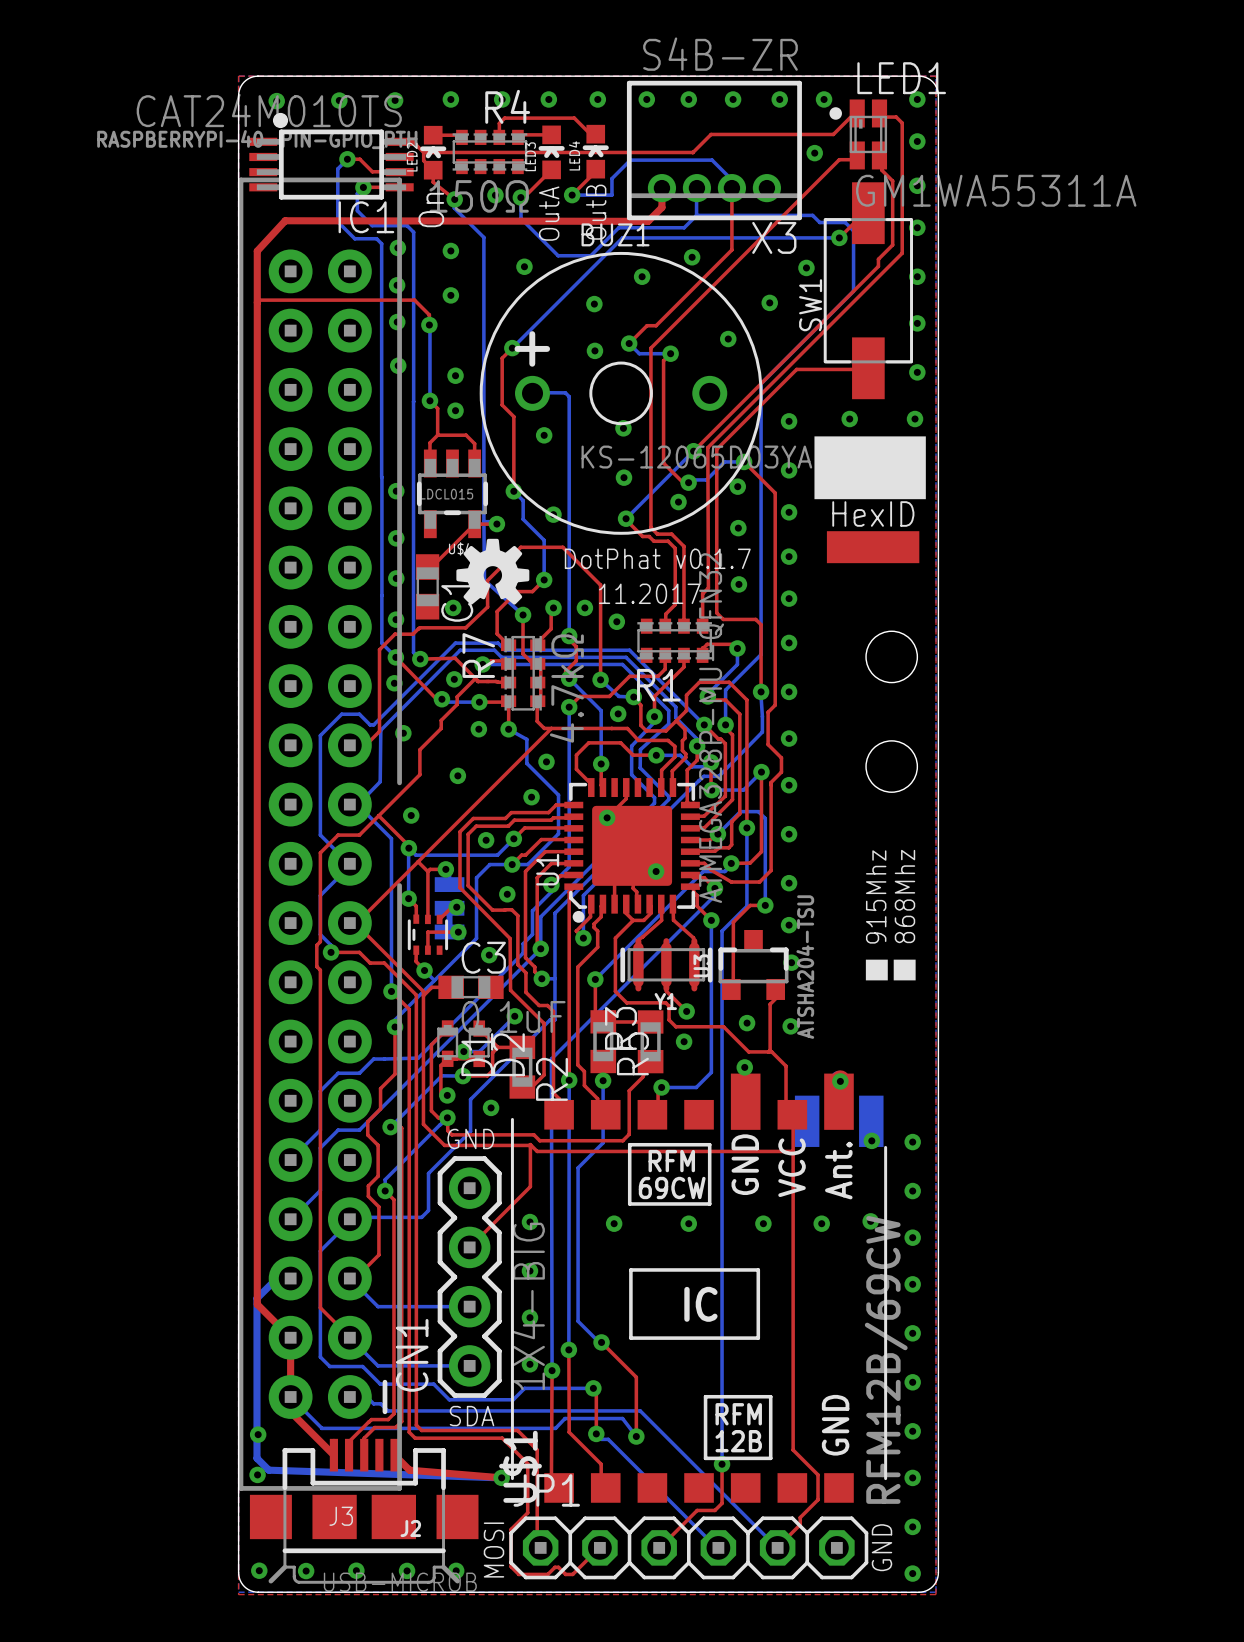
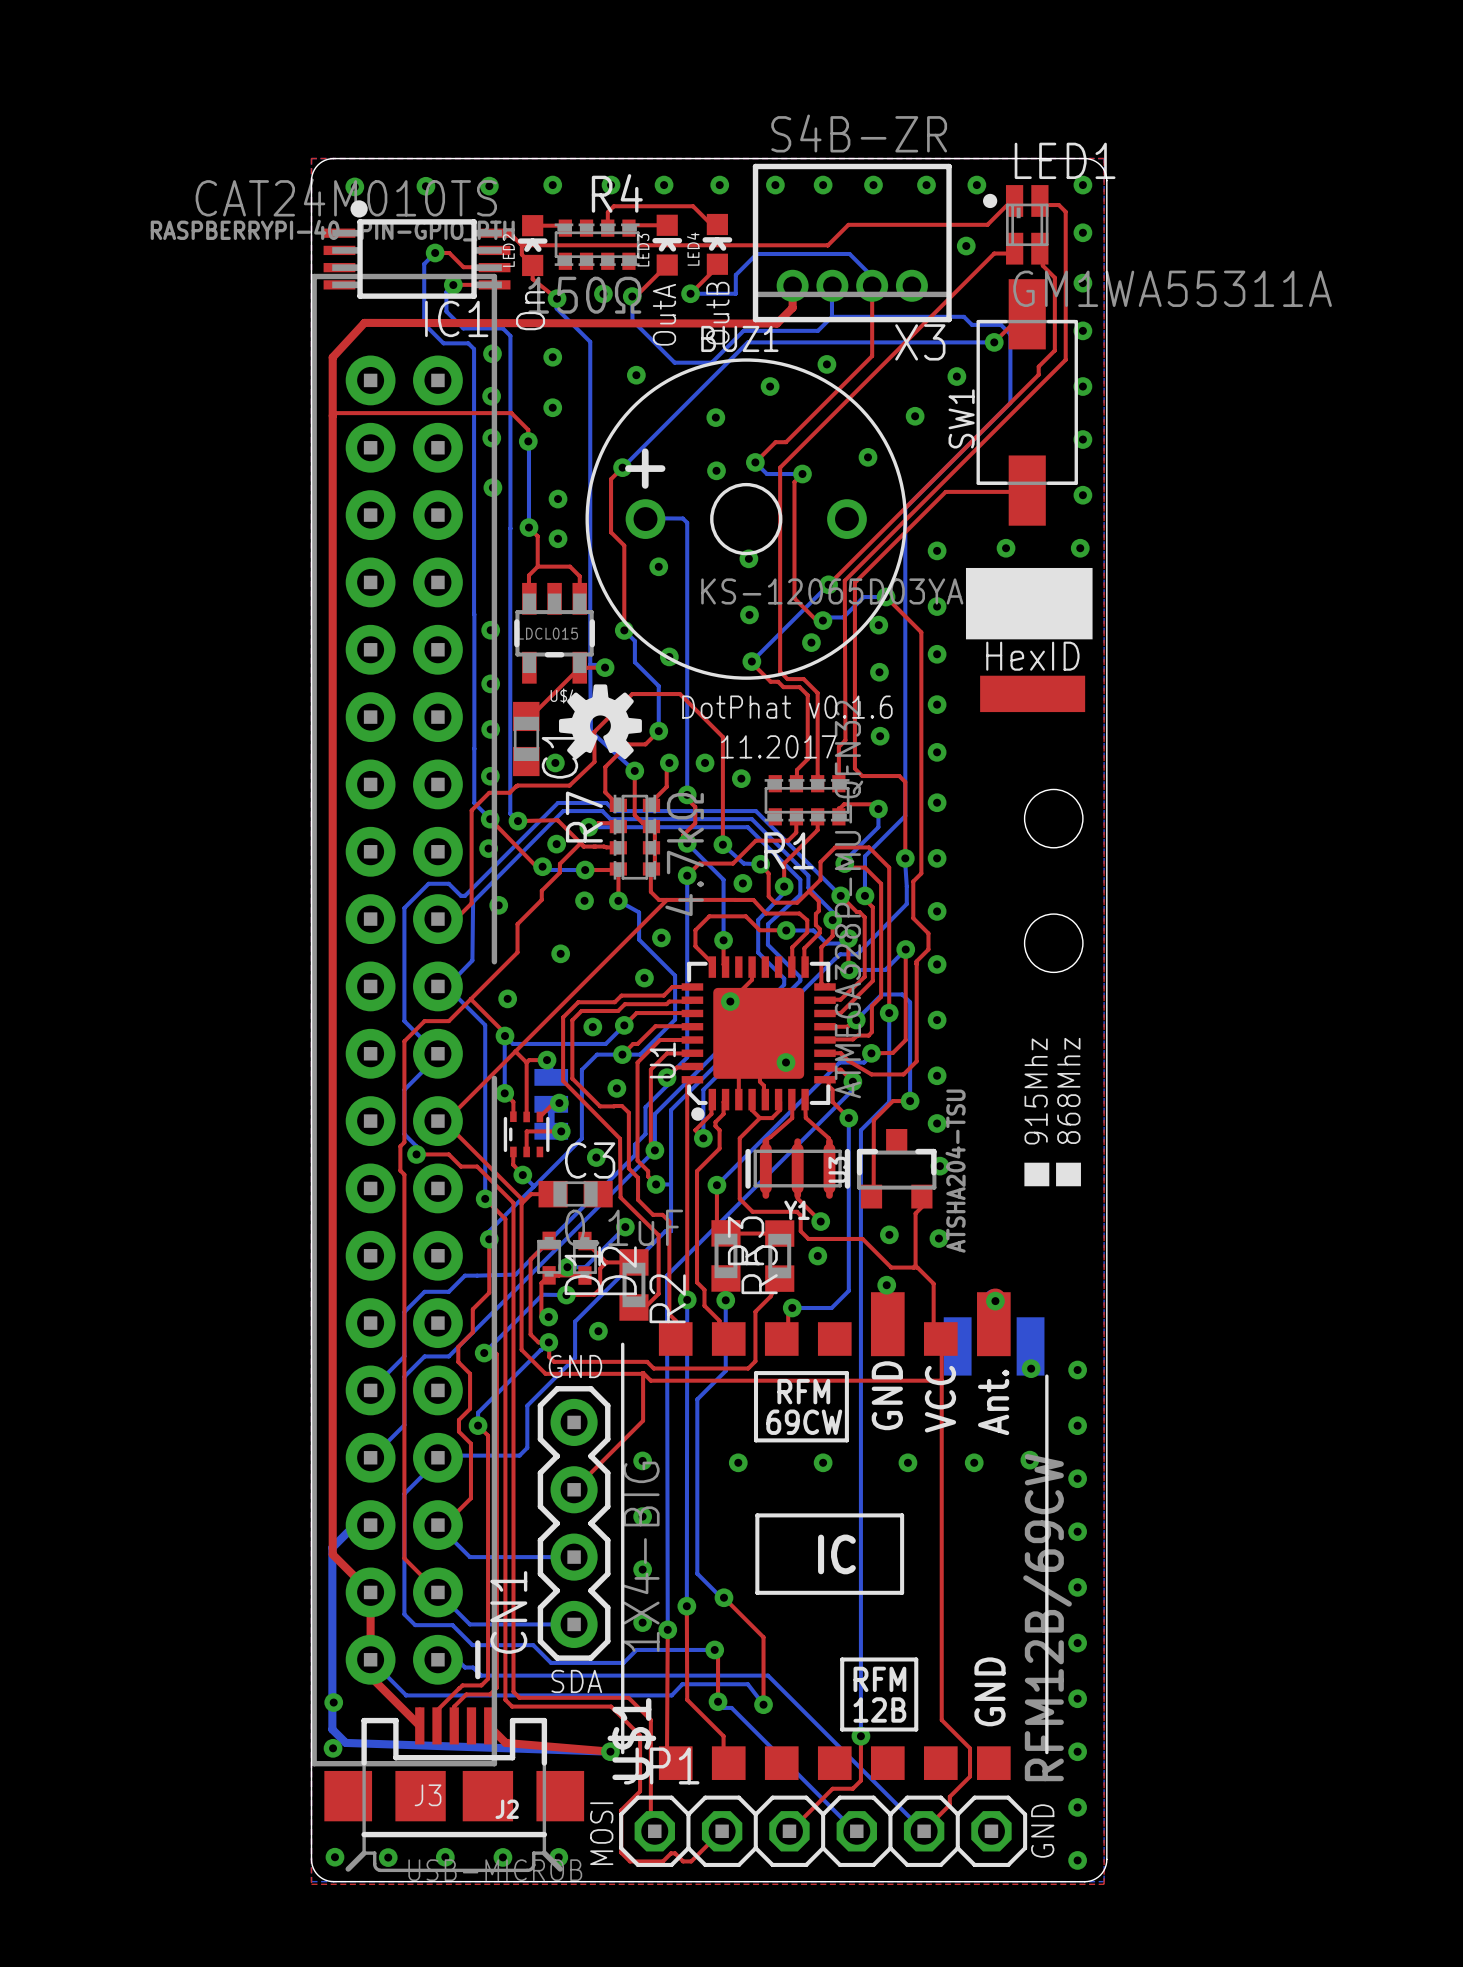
text: DotPhat v0.1.7 (657, 558) -> DotPhat v0.1.6 (787, 707)

